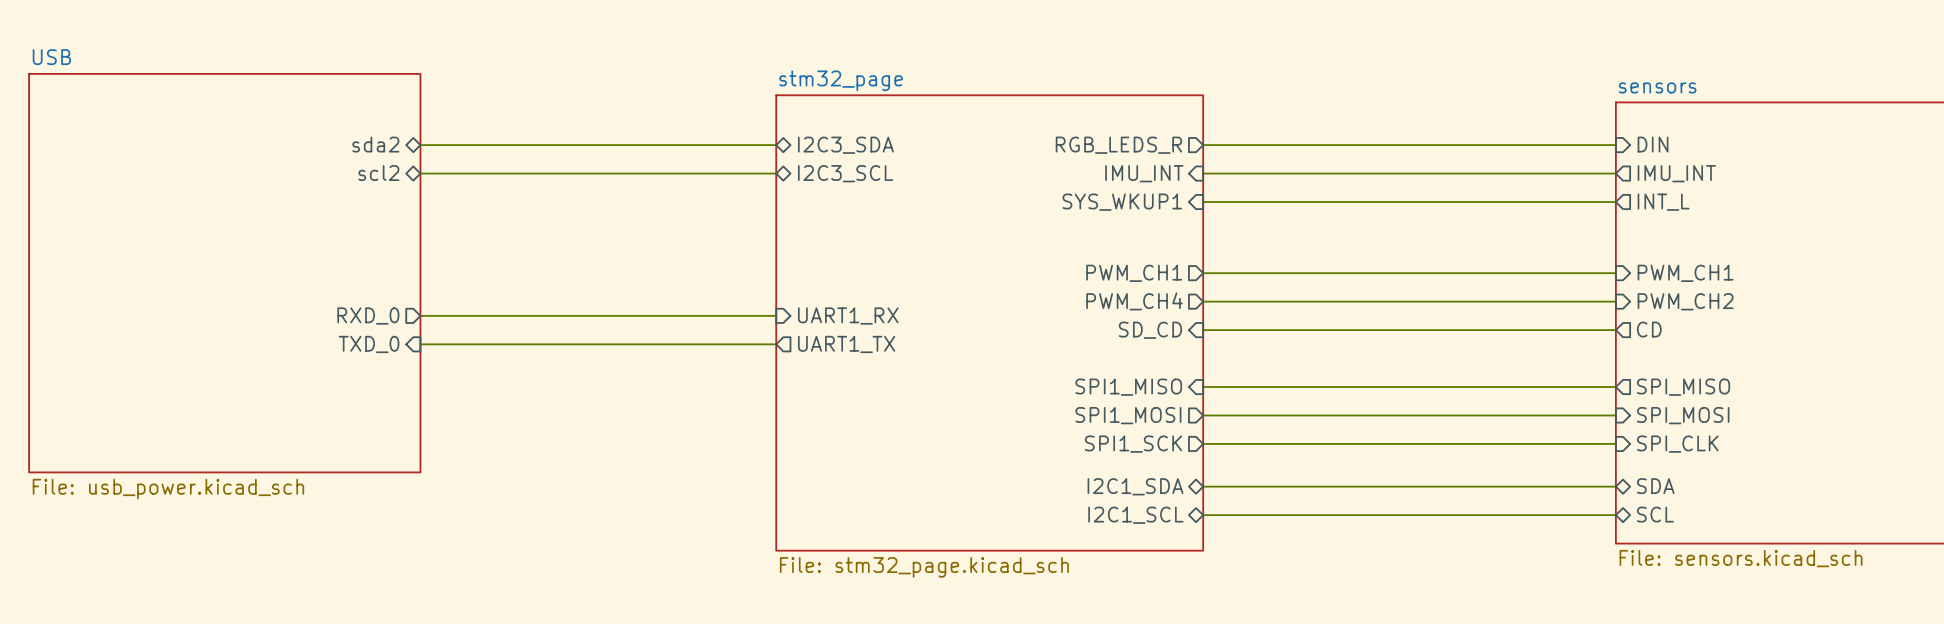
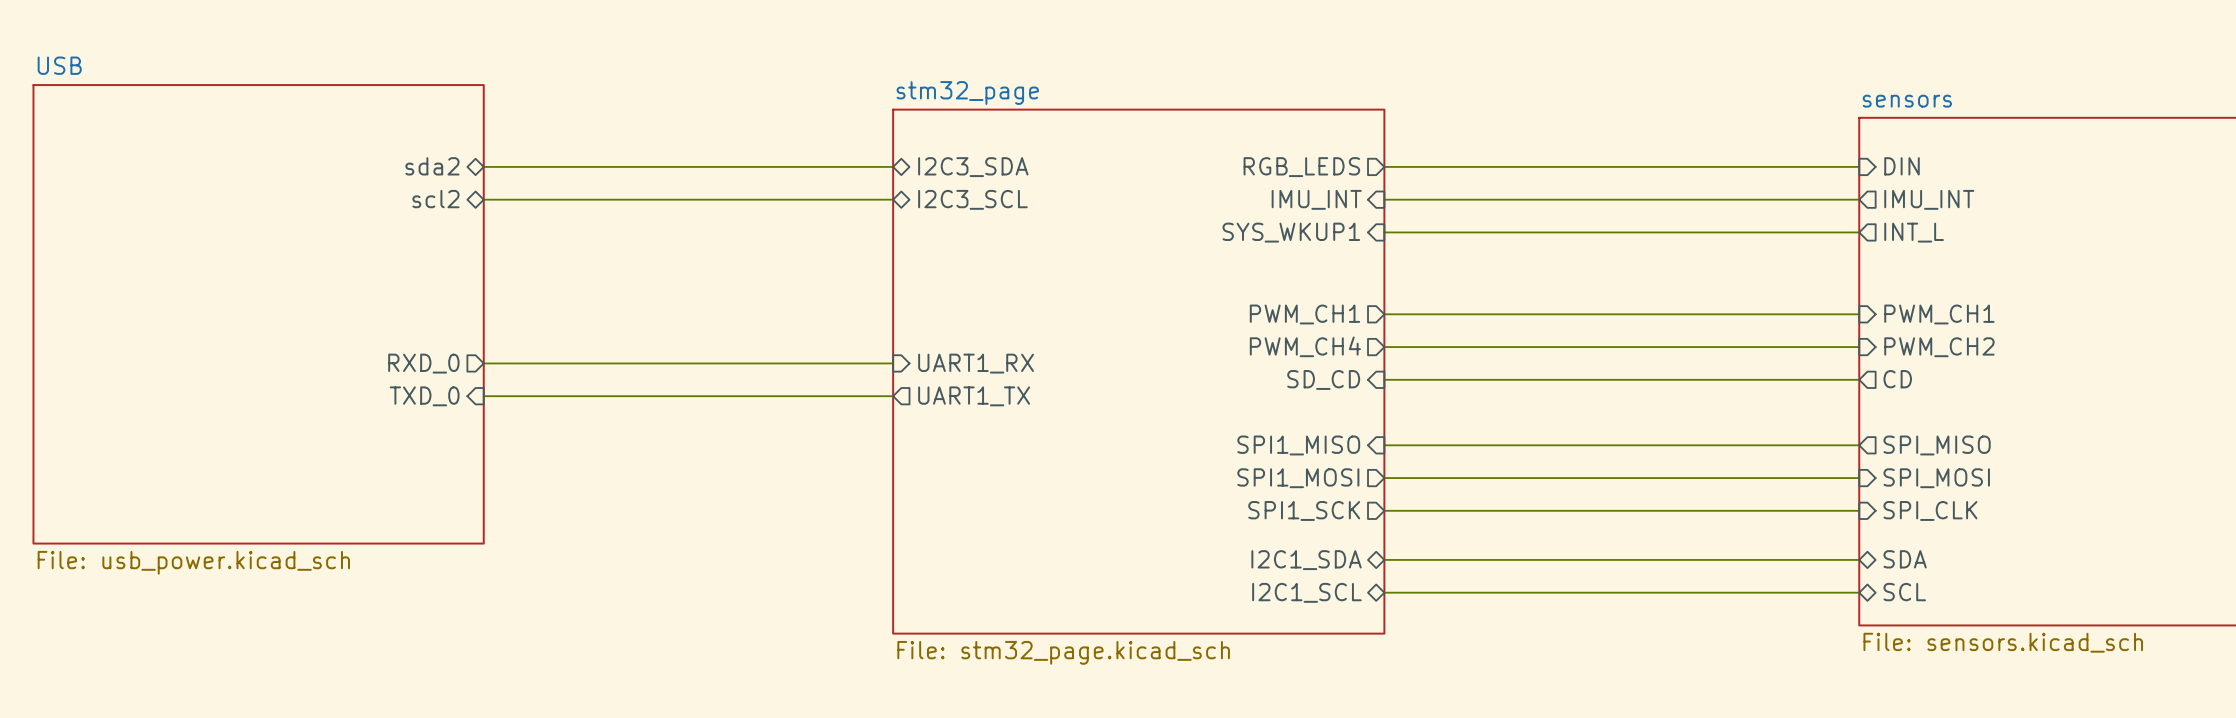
sheet pin: RGB_LEDS_R (1118, 145) -> RGB_LEDS (1301, 167)

